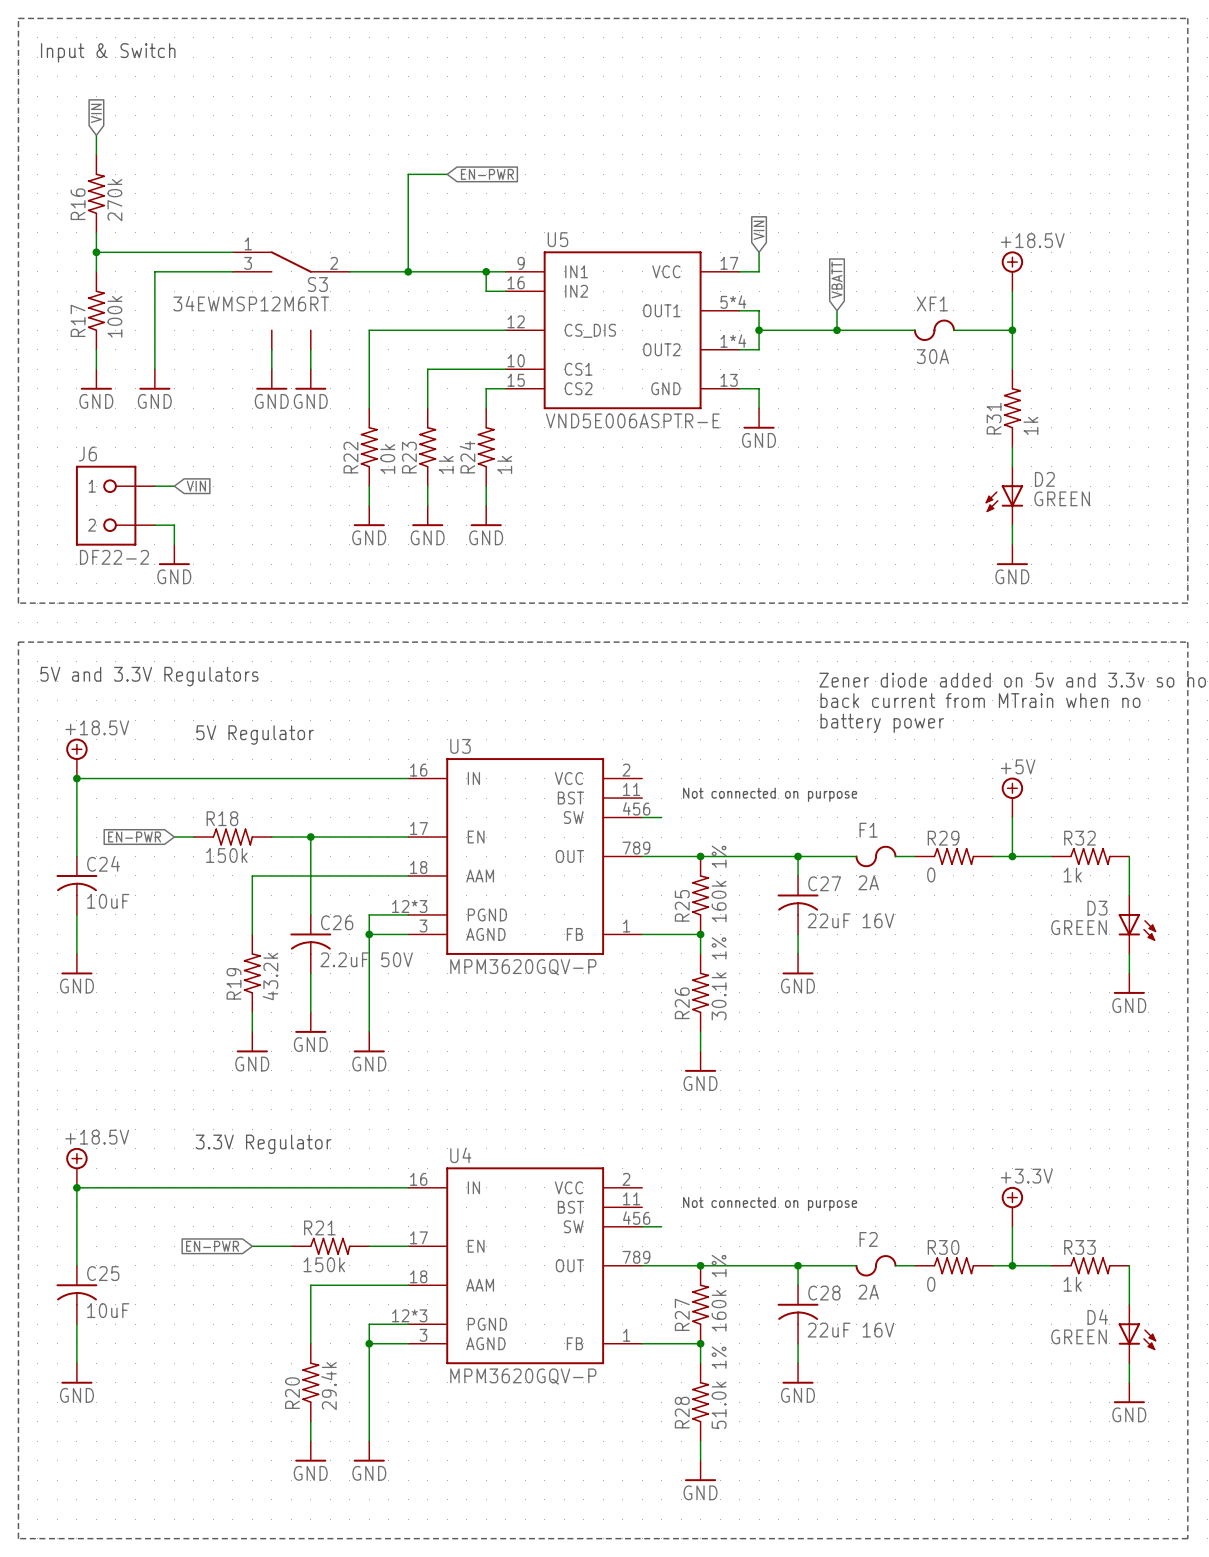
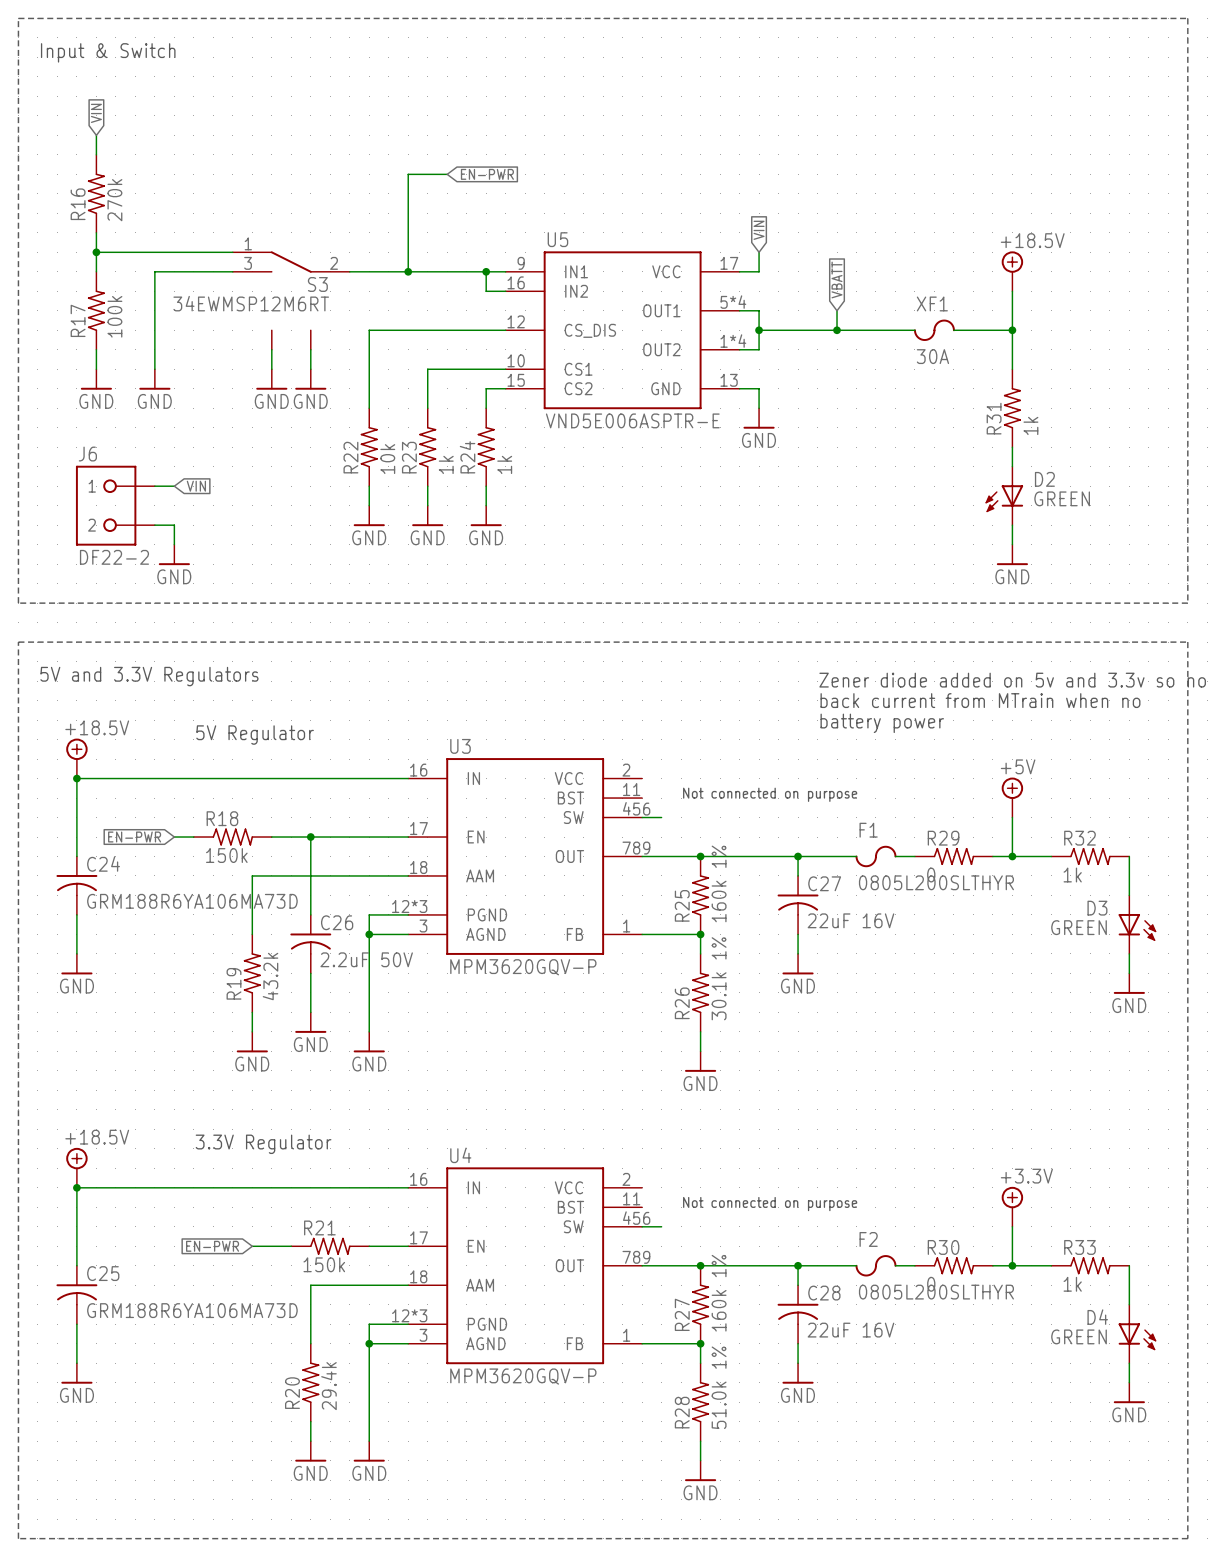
F1 value: 2A (868, 882) -> 0805L200SLTHYR (936, 882)
C24 value: 10uF (108, 901) -> GRM188R6YA106MA73D (192, 901)
F2 value: 2A (868, 1292) -> 0805L200SLTHYR (936, 1292)
C25 value: 10uF (108, 1310) -> GRM188R6YA106MA73D (192, 1310)

